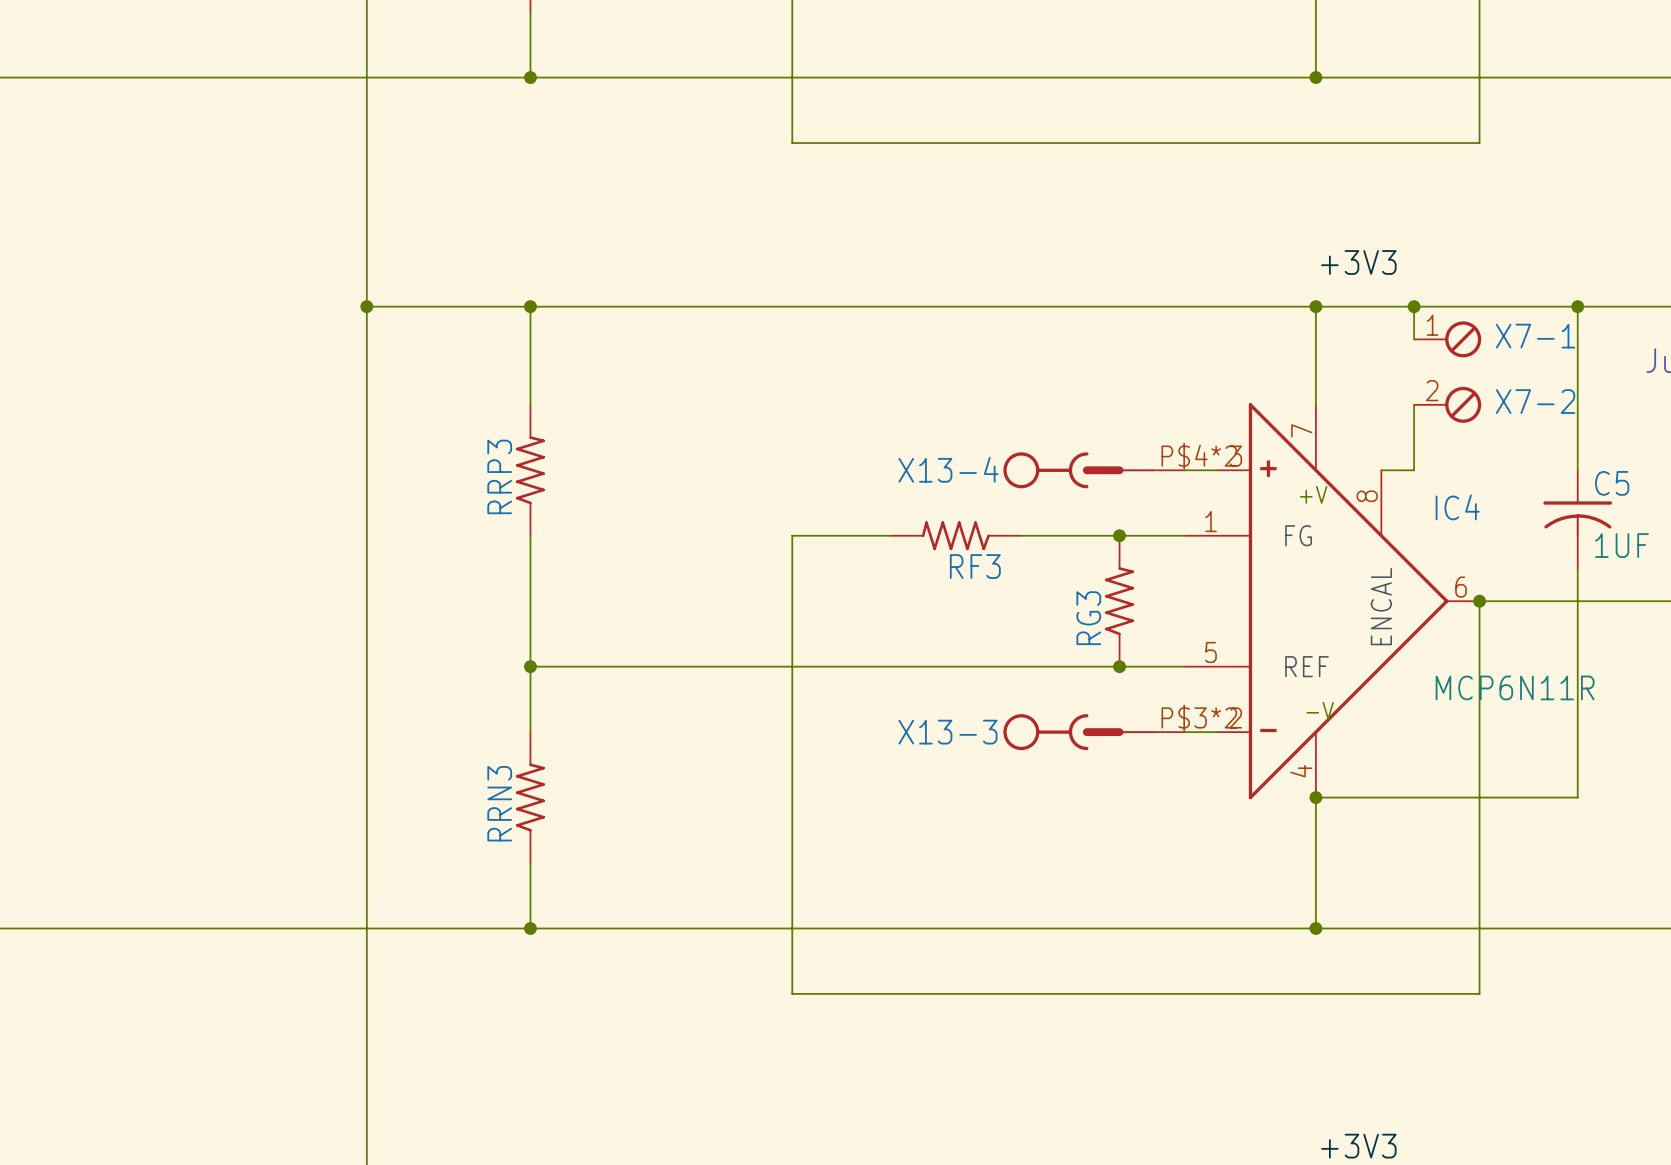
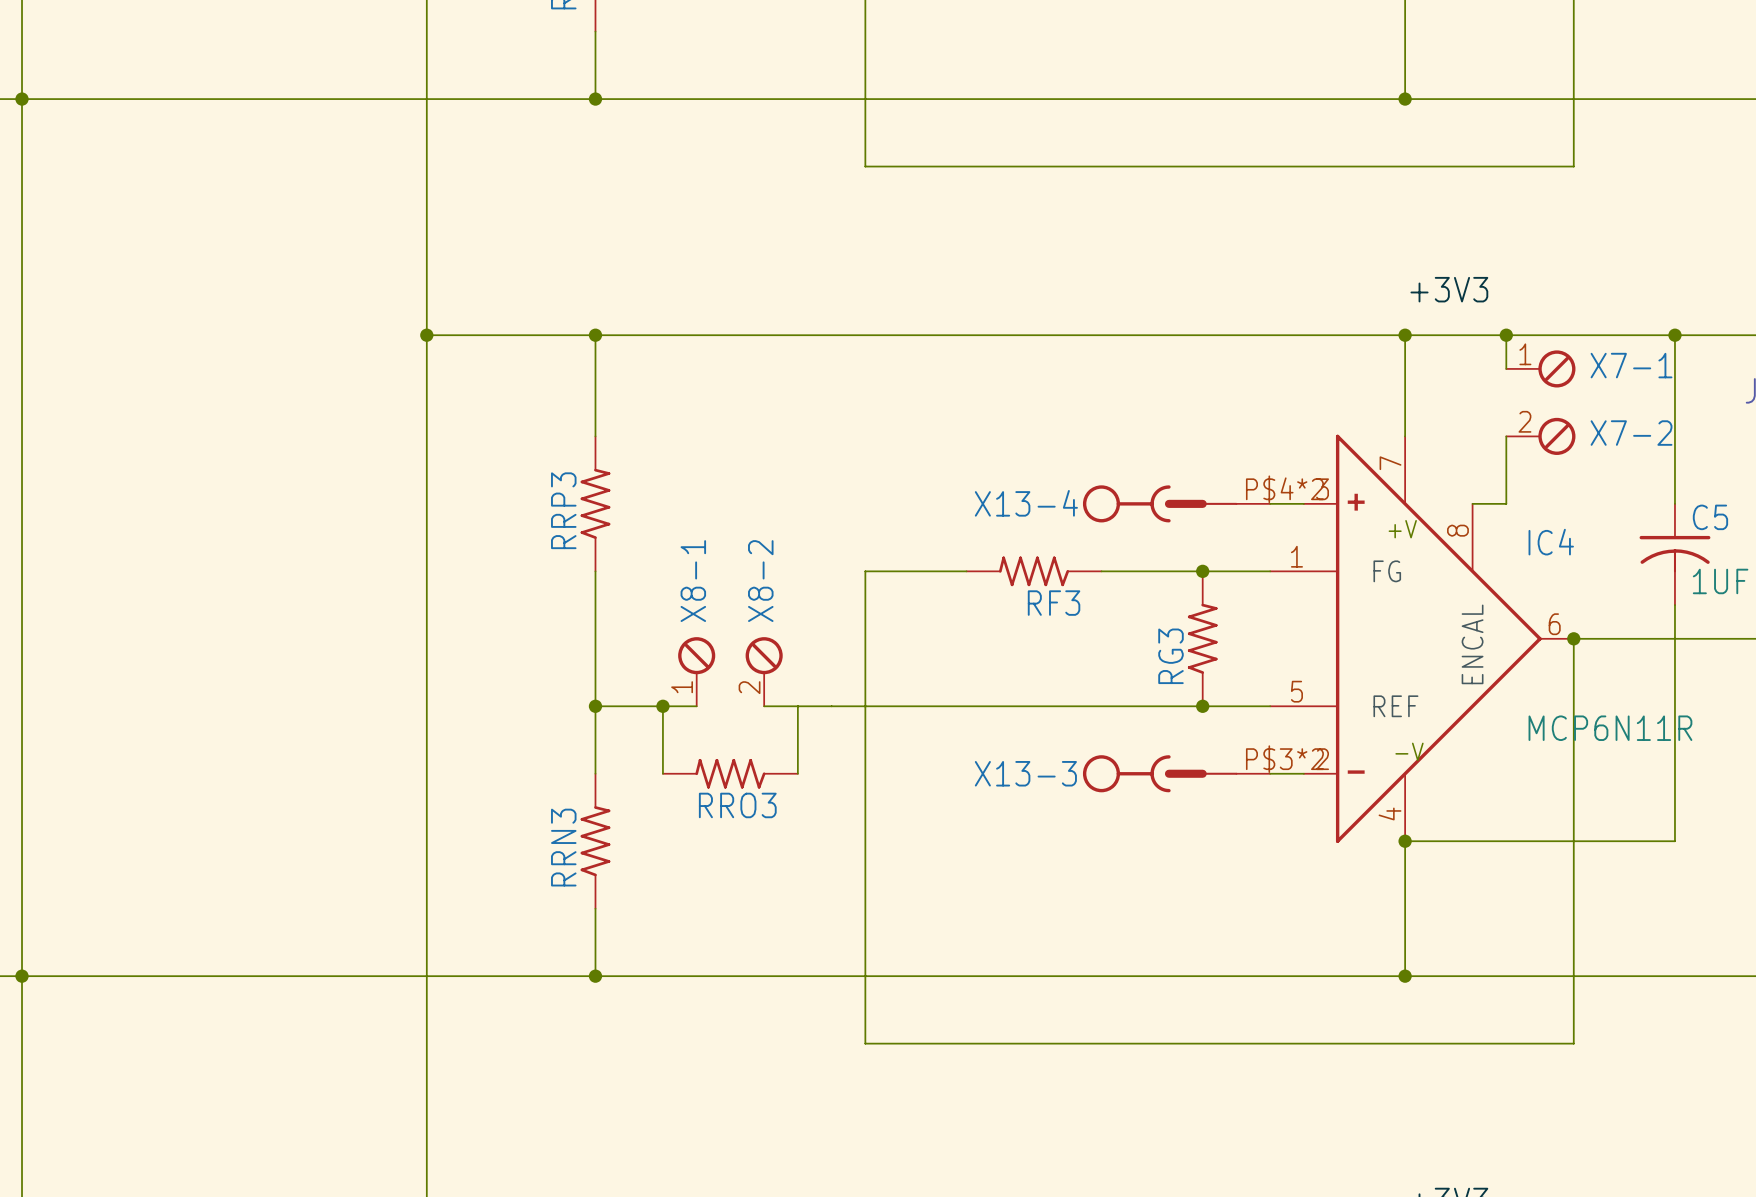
X8-1: none -> (696, 671)
X8-2: none -> (764, 671)
wire: none -> (662, 706) (662, 773)
junction: none -> (662, 706)
wire: (628, 666) (694, 666) -> none
wire: none -> (797, 706) (797, 773)
RRO3: none -> (730, 773)

